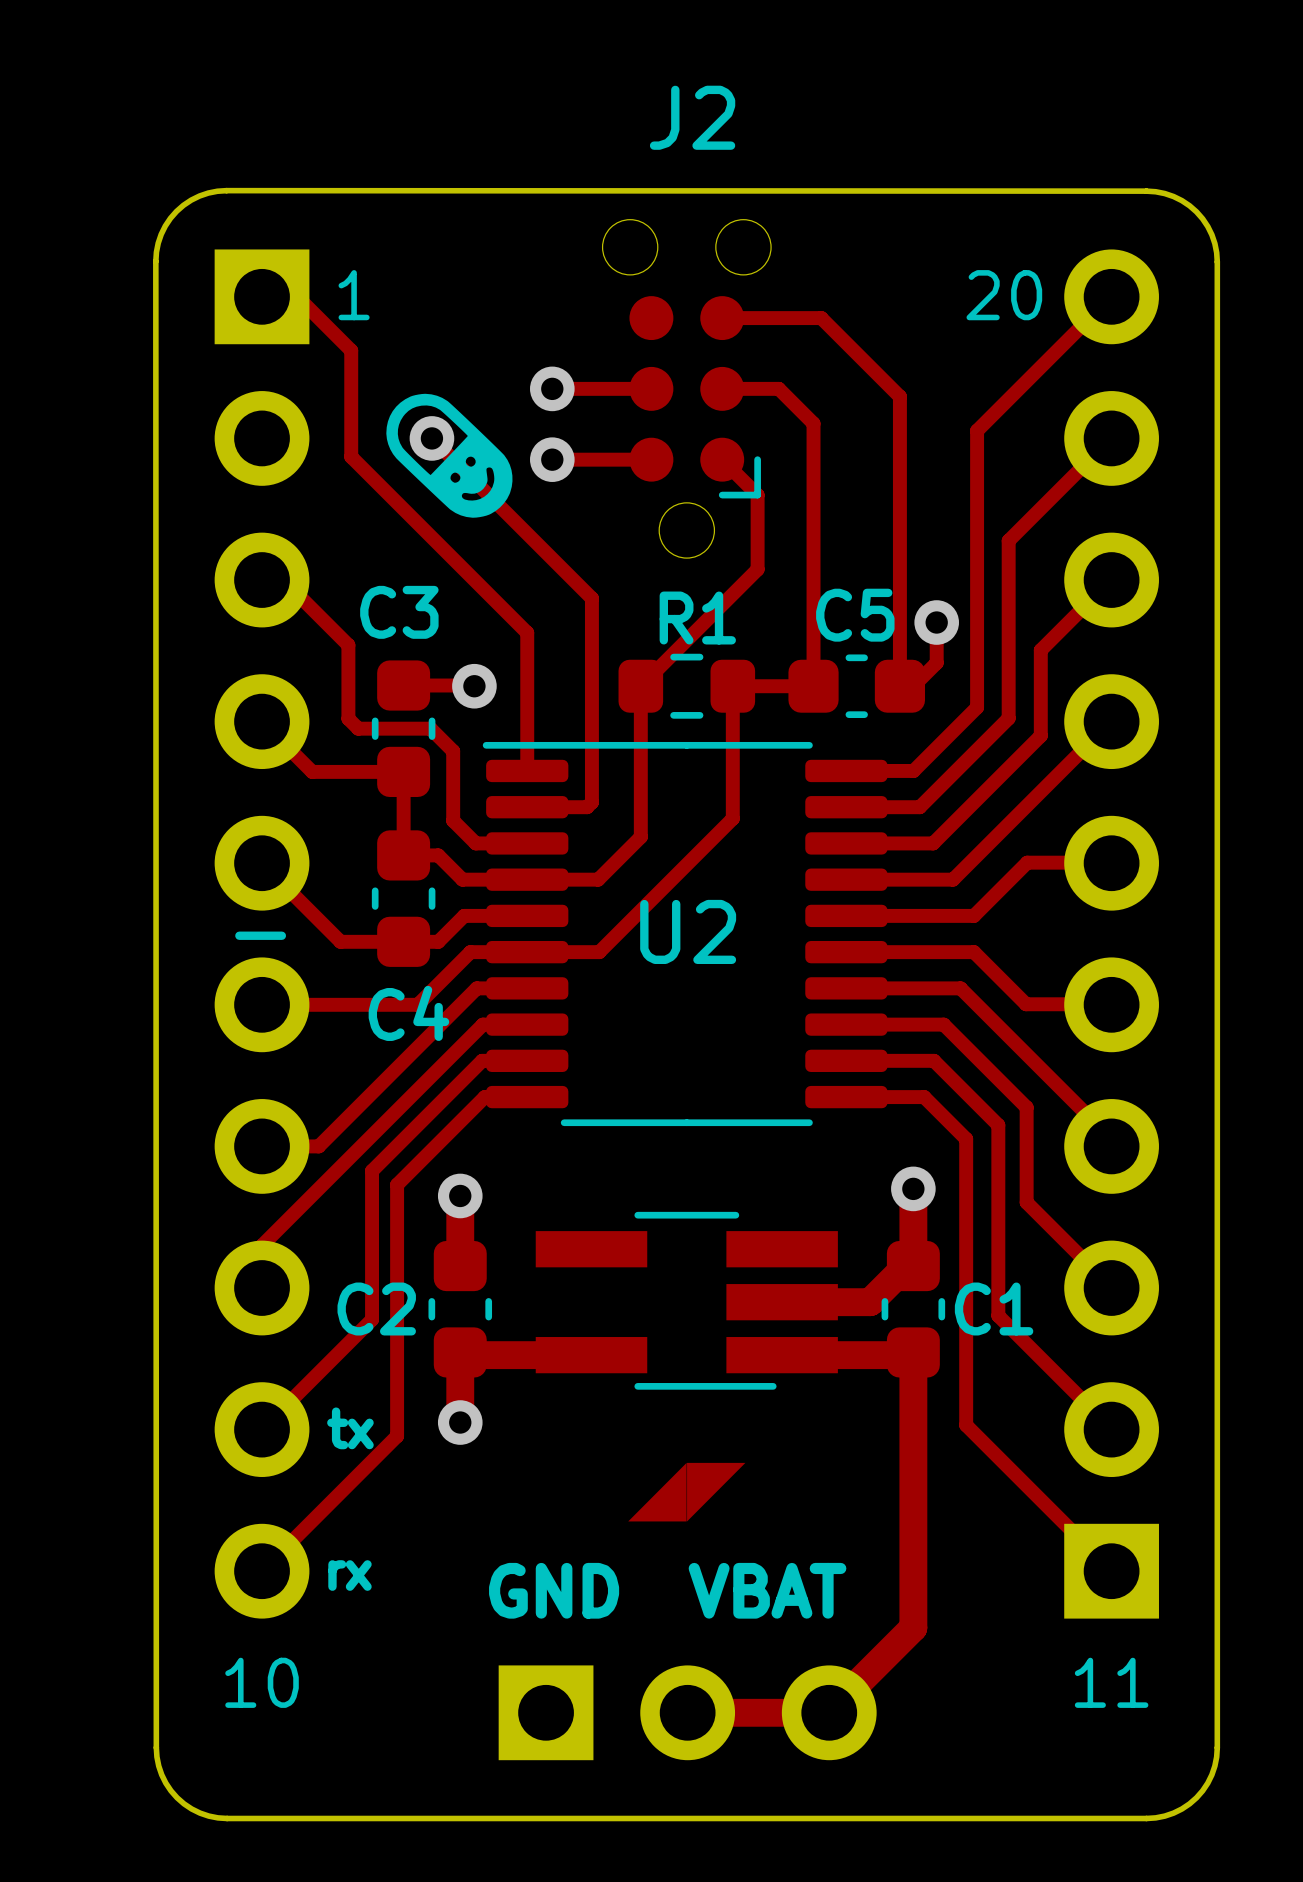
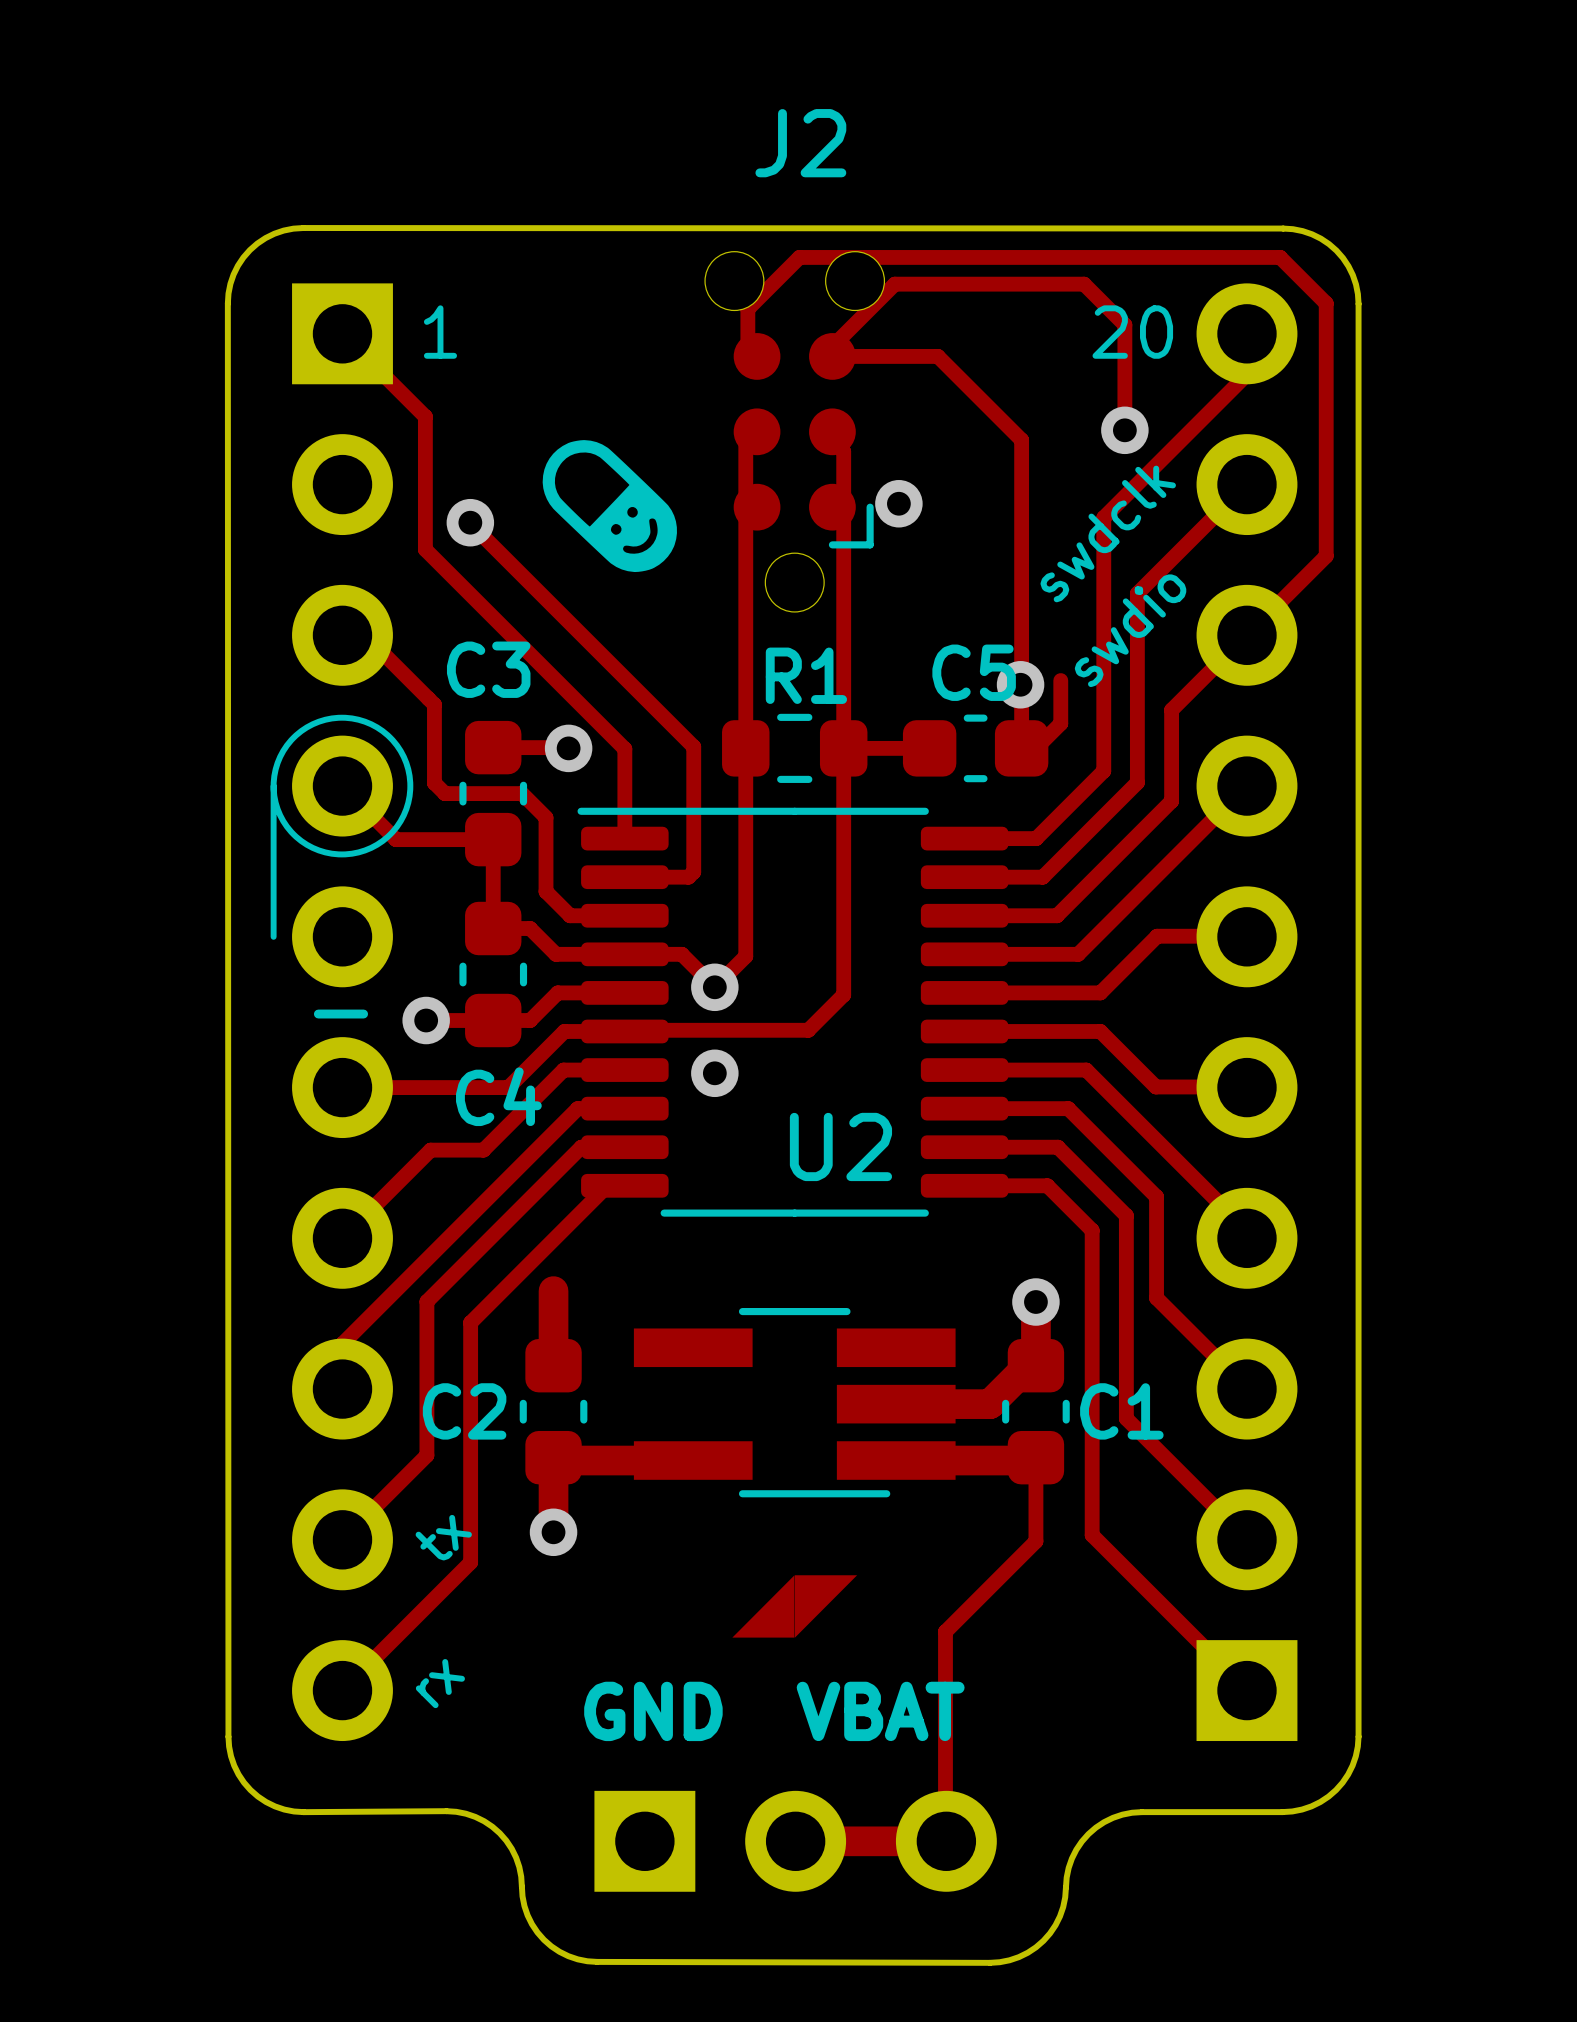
board edge: (226, 190) (1146, 191) (1164, 193) (1181, 200) (1196, 211) (1207, 226) (1214, 243) (1217, 261) (1217, 1747) (1214, 1766) (1207, 1783) (1196, 1797) (1181, 1809) (1164, 1816) (1146, 1818) (227, 1818) (208, 1816) (191, 1809) (177, 1797) (165, 1783) (158, 1766) (156, 1747) (155, 261) (161, 234) (176, 211) (199, 196) (226, 190) -> (303, 228) (274, 233) (249, 250) (233, 274) (227, 303) (228, 1736) (231, 1756) (238, 1774) (250, 1790) (266, 1802) (293, 1811) (446, 1811) (466, 1813) (484, 1821) (506, 1840) (516, 1857) (521, 1876) (524, 1906) (537, 1932) (559, 1951) (577, 1959) (597, 1961) (989, 1962) (1009, 1960) (1036, 1947) (1050, 1933) (1063, 1907) (1066, 1877) (1071, 1858) (1081, 1841) (1104, 1822) (1132, 1812) (1282, 1812) (1302, 1809) (1320, 1802) (1336, 1790) (1348, 1774) (1355, 1756) (1358, 1736) (1358, 303) (1355, 284) (1348, 266) (1336, 250) (1320, 238) (1302, 231) (1283, 228) (303, 228)
track: (262, 296) (297, 296) (351, 350) (351, 456) (527, 632) (527, 686) -> (342, 333) (425, 416) (425, 549) (624, 749)
track: (1111, 296) (977, 430) (977, 469) -> (1246, 333) (1246, 374) (1103, 517)
track: none -> (747, 355) (747, 309) (799, 257) (1280, 257) (1326, 303) (1326, 556) (1246, 635)
track: none -> (823, 355) (894, 284) (1084, 284) (1124, 324) (1124, 430)
via: none -> (1124, 430)
track: (552, 388) (651, 388) -> none
via: (552, 388) -> none
track: none -> (823, 431) (843, 451) (843, 748)
track: (722, 388) (778, 388) (813, 423) (813, 686) -> none
track: (431, 438) (591, 598) (591, 684) -> (470, 523) (693, 746)
via position: (431, 438) -> (470, 522)
drawing position: (449, 455) -> (609, 506)
via: none -> (898, 503)
track: (552, 459) (651, 459) -> none
via: (552, 459) -> none
track: (722, 459) (757, 495) (757, 569) (640, 686) -> (747, 431) (745, 433) (745, 748)
text: none -> swdclk (1108, 533)
text: none -> swdio (1130, 630)
via position: (936, 622) -> (1020, 684)
drawing: none -> [270, 714, 414, 858]
line: none -> (273, 786) (273, 936)
track: (732, 818) (599, 952) (527, 952) -> (843, 889) (843, 994) (808, 1030) (624, 1031)
track: (640, 837) (598, 879) (580, 879) -> (745, 908) (745, 956) (714, 987) (681, 954)
track: (262, 863) (340, 941) -> none
via: none -> (714, 987)
U2 name position: U2 (688, 931) -> U2 (840, 1146)
via: none -> (426, 1020)
track: (476, 988) (318, 1146) (262, 1146) -> (571, 1070) (563, 1070) (483, 1150) (430, 1150) (342, 1238)
via: none -> (714, 1073)
track: (486, 1060) (482, 1060) (372, 1170) (372, 1319) (341, 1350) -> (581, 1147) (426, 1301) (426, 1455)
track: (511, 1097) (484, 1097) (397, 1184) (397, 1436) (382, 1450) -> (607, 1185) (470, 1322) (470, 1562)
via position: (913, 1188) -> (1035, 1302)
via: (460, 1195) -> none
track width: thick (913, 1352) (913, 1431) -> thin (1035, 1457) (1035, 1541)
text rotation: 0° (350, 1428) -> 45° counterclockwise (443, 1537)
track: (913, 1431) (913, 1627) (828, 1712) -> (1035, 1541) (945, 1631) (945, 1841)
text rotation: 0° (349, 1575) -> 45° counterclockwise (440, 1683)
text: 10 (262, 1682) -> none
text: 11 (1111, 1682) -> none

